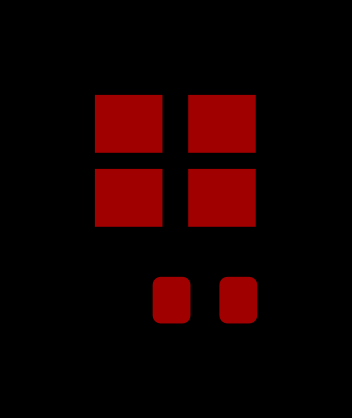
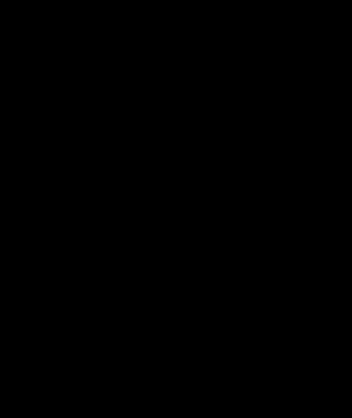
part: (175, 160) -> none
part: (204, 300) -> none

